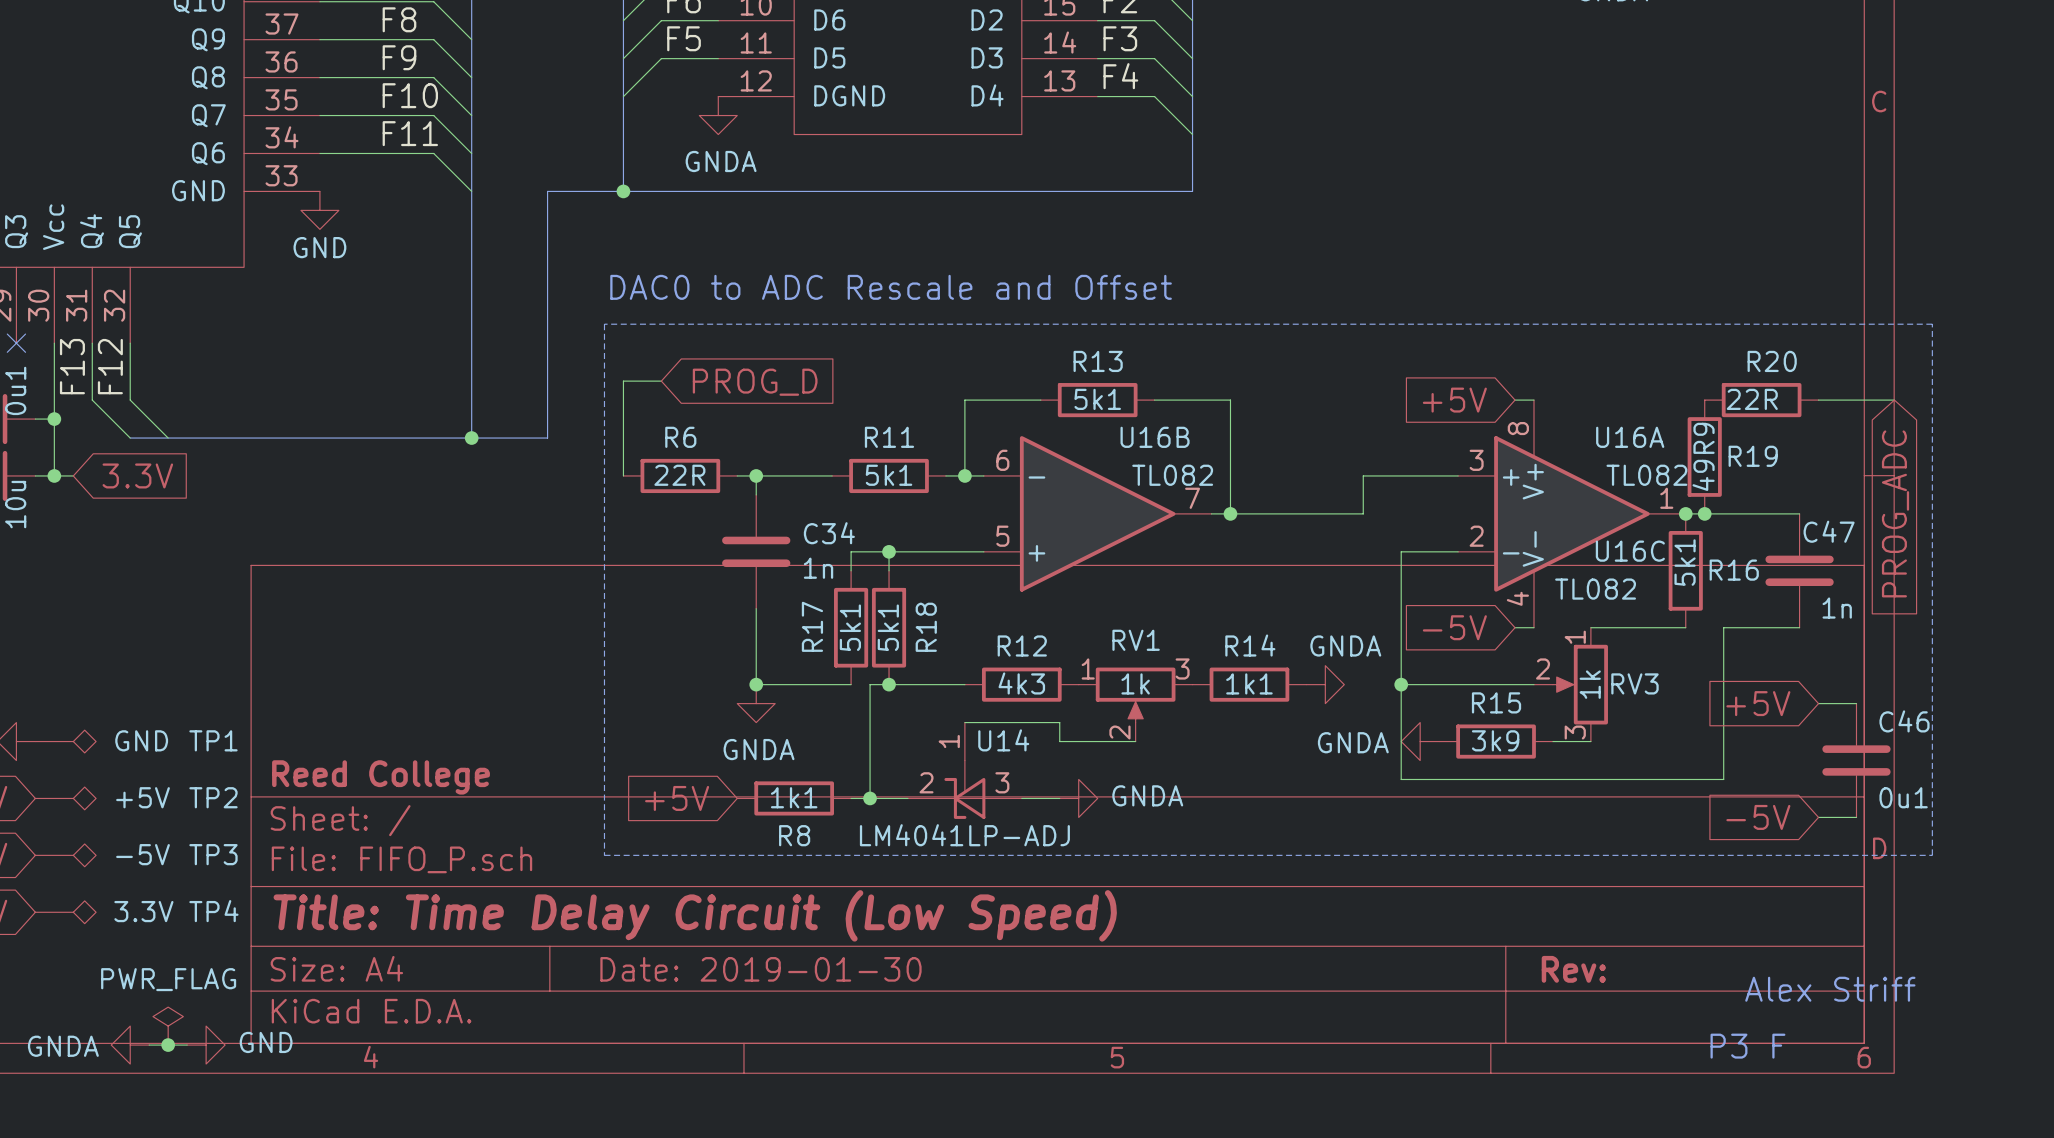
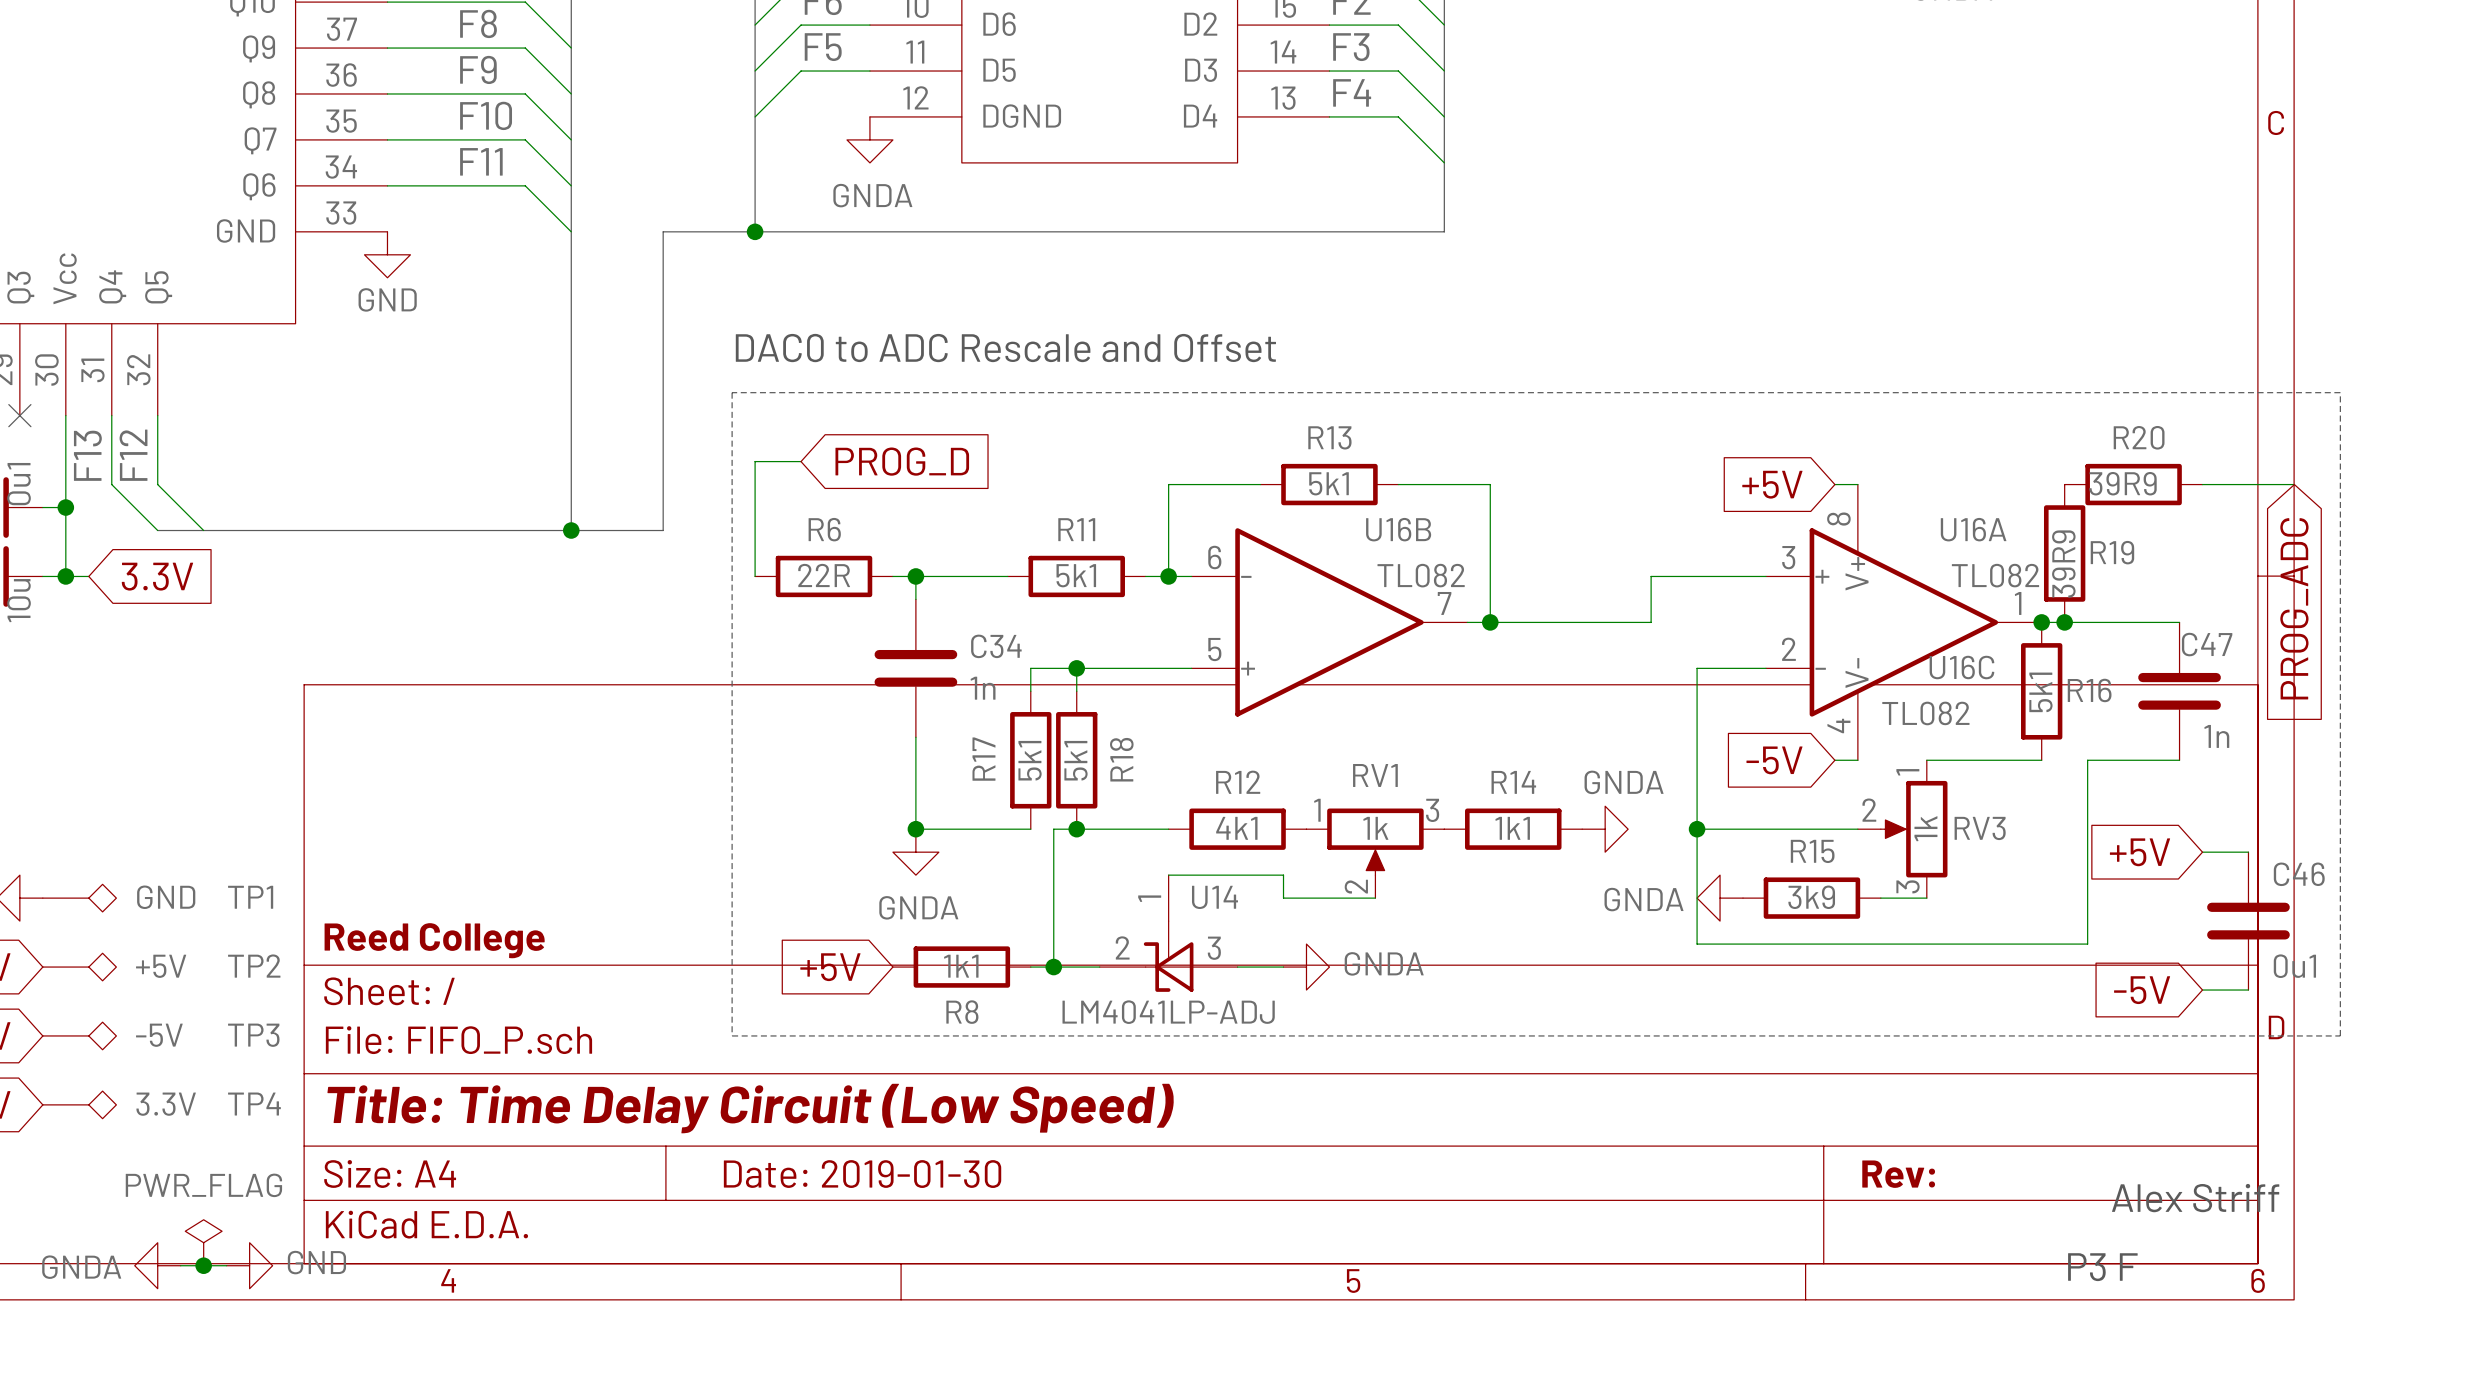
R20 value: 22R (1752, 399) -> 39R9 (2122, 483)
R19 value: 49R9 (1703, 456) -> 39R9 (2063, 564)
R12 value: 4k3 (1021, 683) -> 4k1 (1236, 828)

